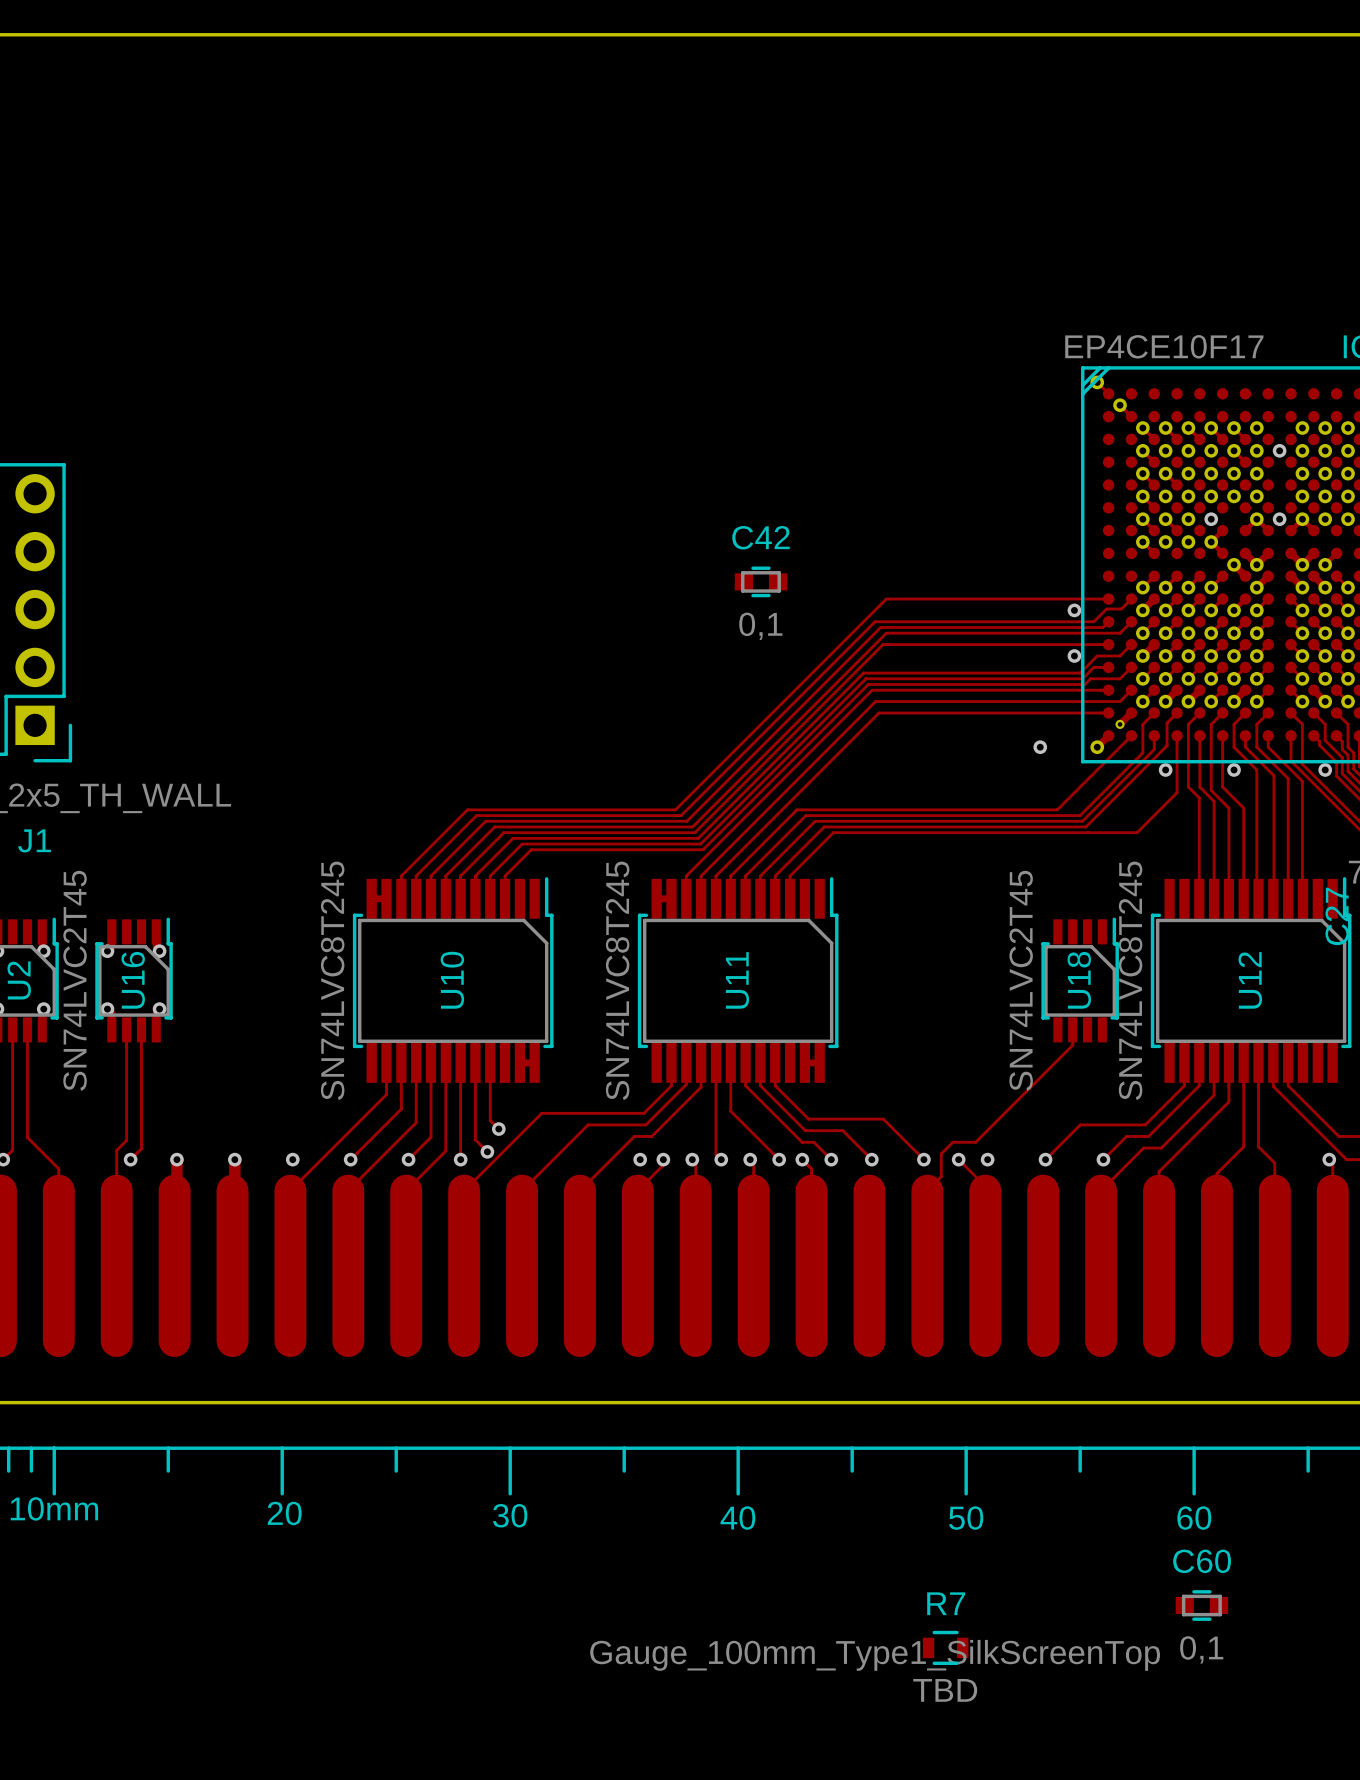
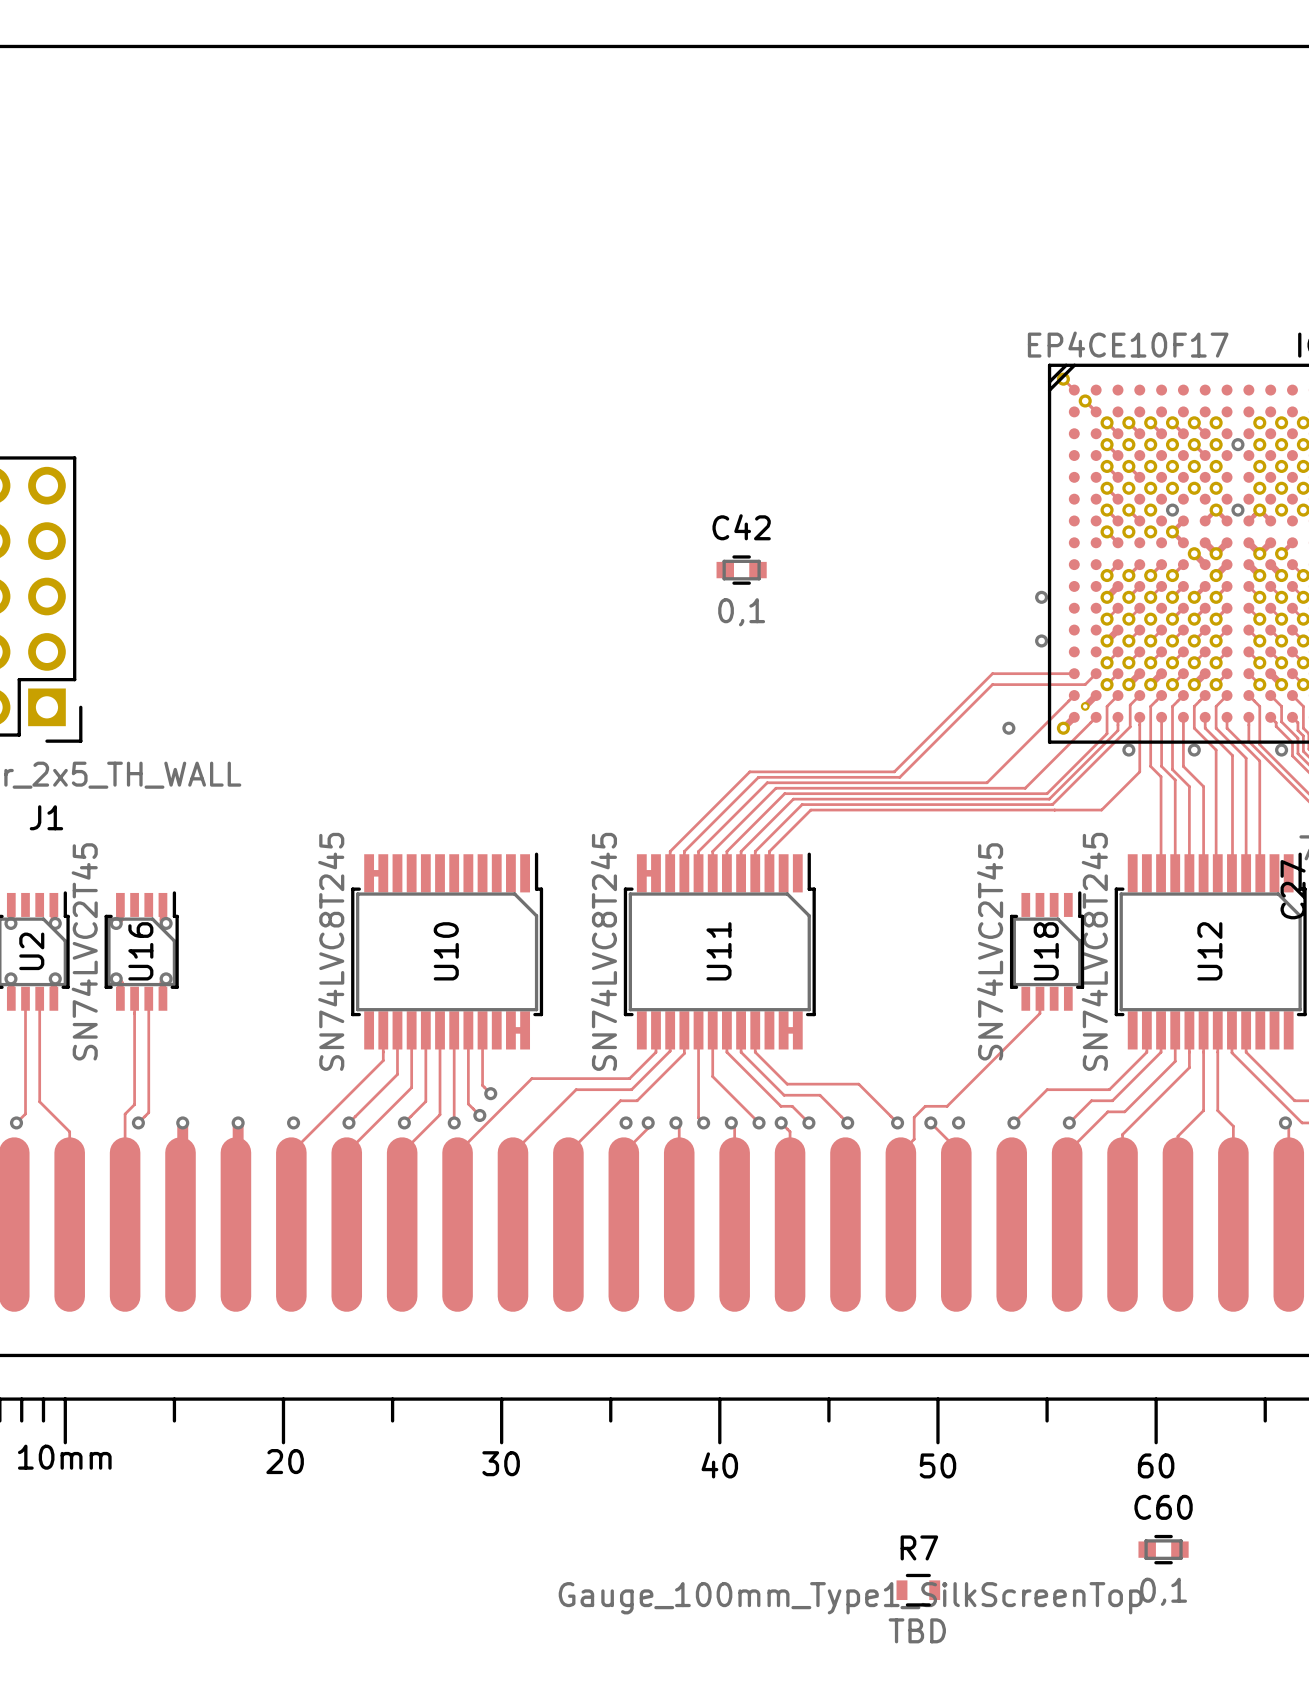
track: (1108, 599) (886, 599) (675, 809) (467, 809) (401, 875) (401, 898) -> none
track: (1131, 599) (1121, 609) (1106, 609) (1093, 621) (874, 621) (681, 815) (476, 815) (416, 875) (416, 898) -> none
track: (1108, 621) (1102, 627) (880, 627) (686, 821) (485, 821) (430, 875) (430, 898) -> none
track: (1131, 621) (1120, 633) (886, 633) (692, 826) (494, 826) (445, 875) (445, 898) -> none
track: (1108, 644) (883, 644) (694, 832) (503, 832) (460, 875) (460, 898) -> none
track: (1131, 644) (1120, 656) (1097, 656) (1080, 673) (863, 673) (698, 838) (513, 838) (475, 875) (475, 898) -> none
track: (1108, 667) (1093, 667) (1082, 678) (865, 678) (700, 844) (522, 844) (490, 875) (490, 898) -> none
track: (1131, 667) (1120, 678) (1090, 678) (1084, 684) (868, 684) (703, 849) (531, 849) (505, 875) (505, 898) -> none
track: (1023, 690) (872, 690) (769, 792) -> (992, 673) (894, 771) (749, 771)
track: (1023, 701) (875, 701) (778, 798) -> (992, 684) (899, 777) (758, 777)
track: (1108, 712) (878, 712) (787, 804) -> (1074, 695) (987, 782) (767, 782)

